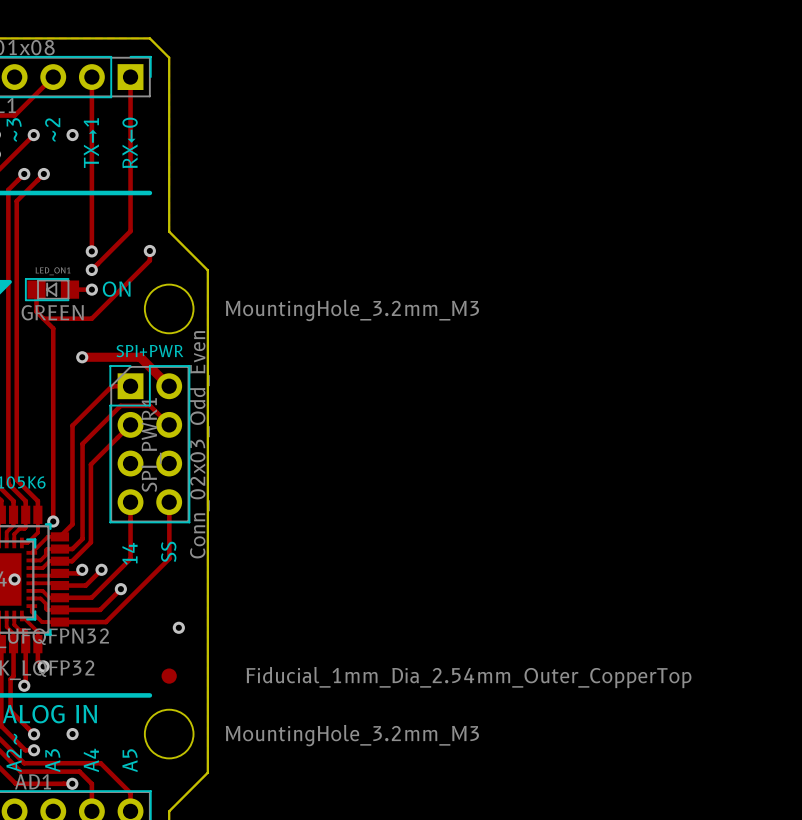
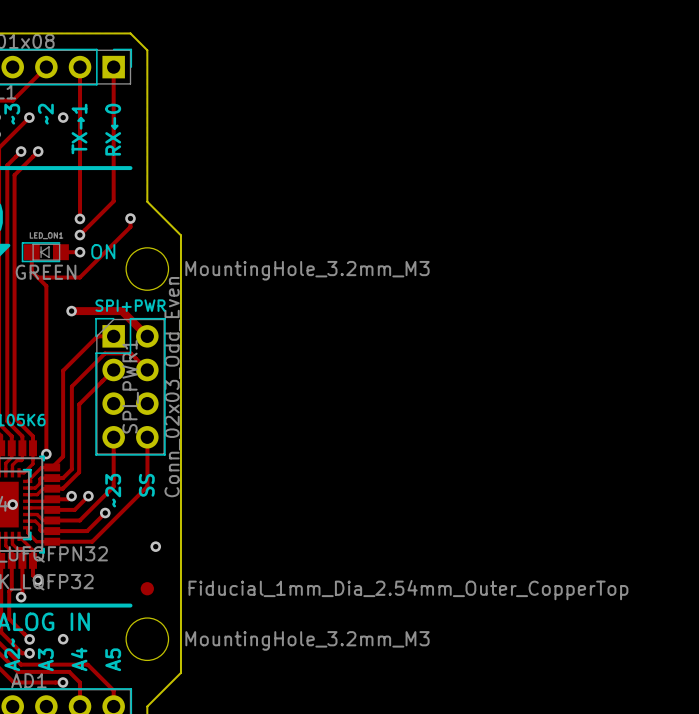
text: 14 (129, 553) -> ~23 (113, 490)

